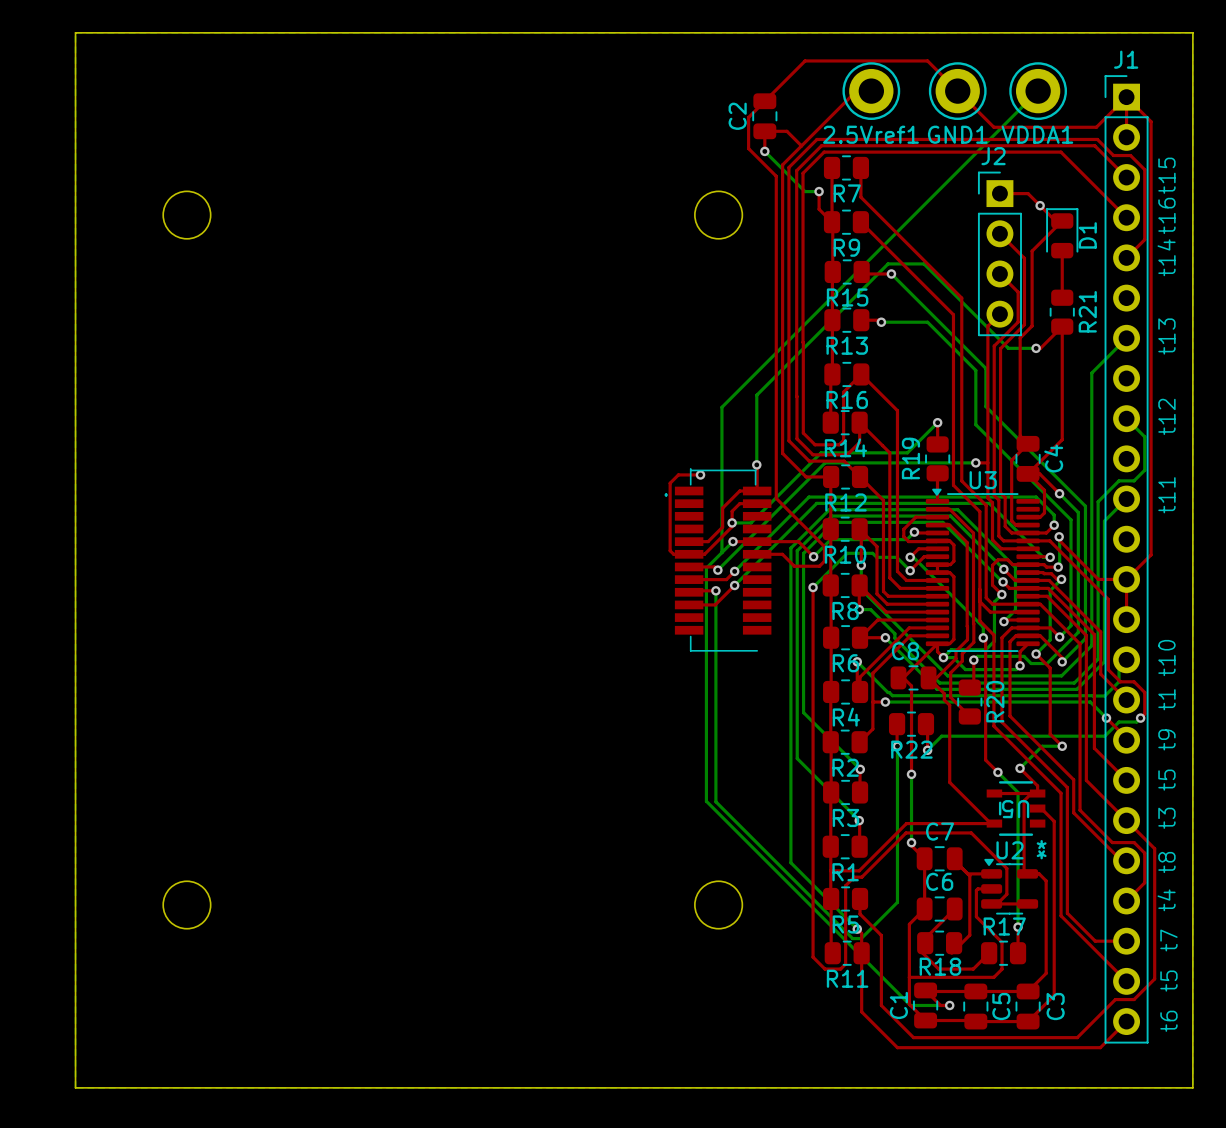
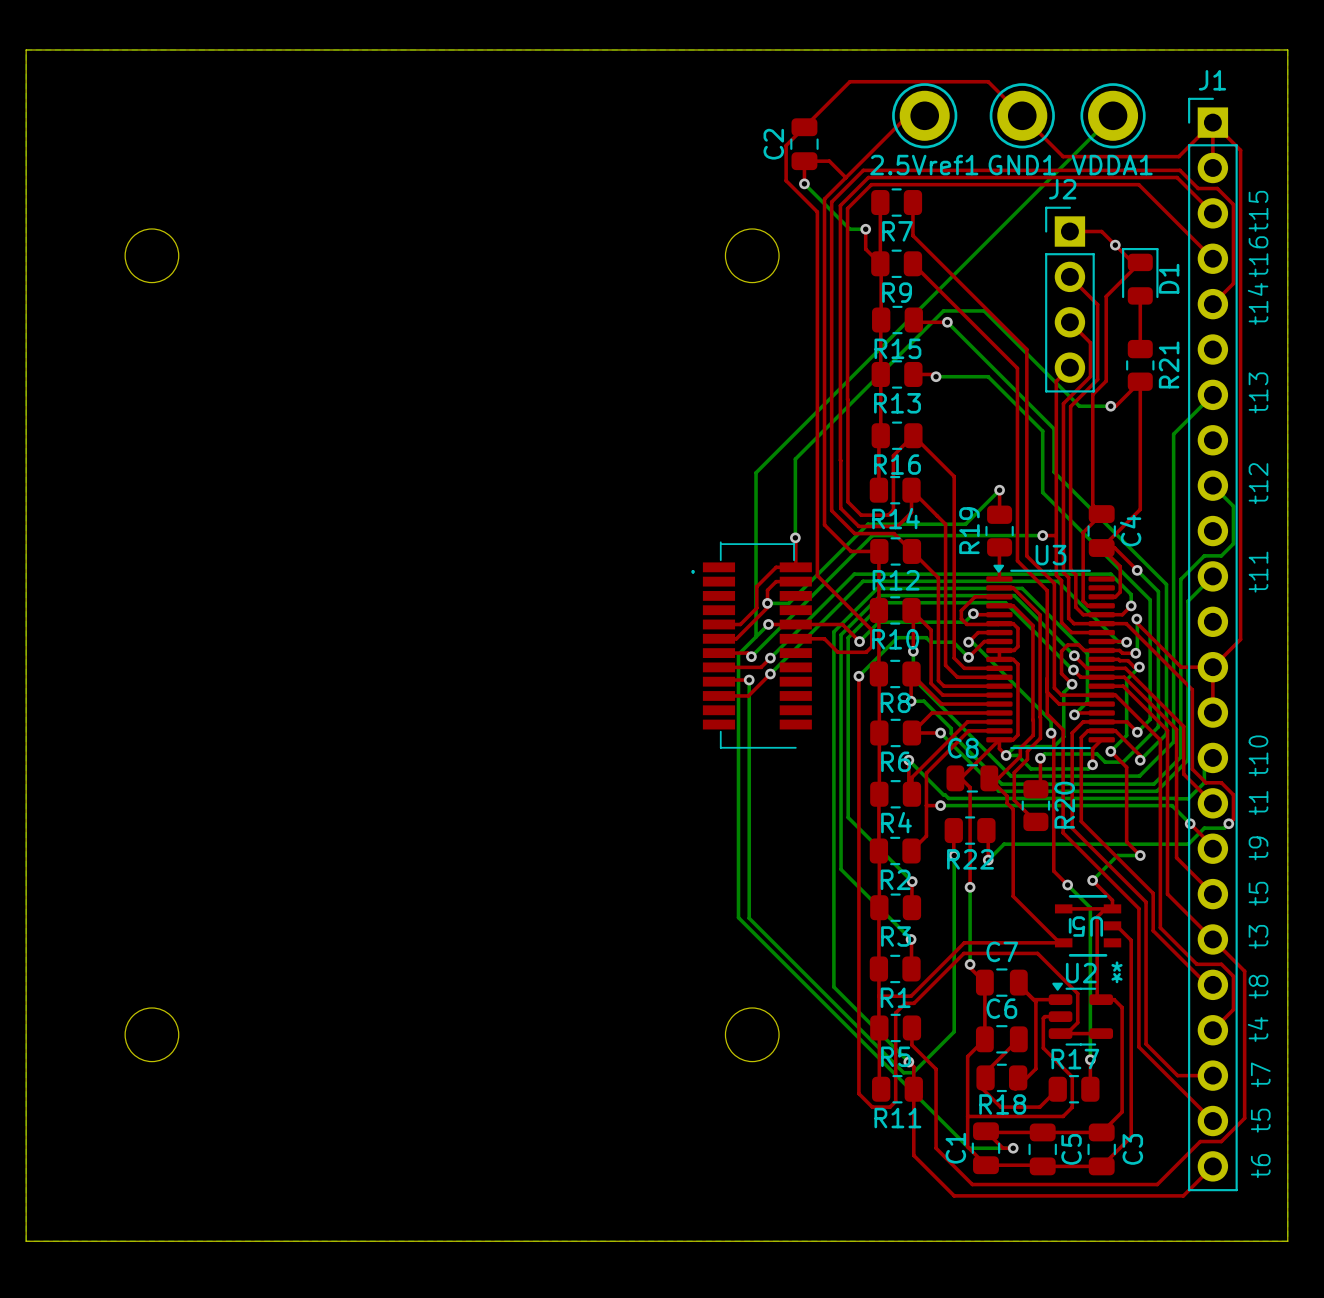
top track: (700, 474) (678, 474) (670, 483) (670, 550) (673, 554) (689, 554) -> none
via: (700, 474) -> none

